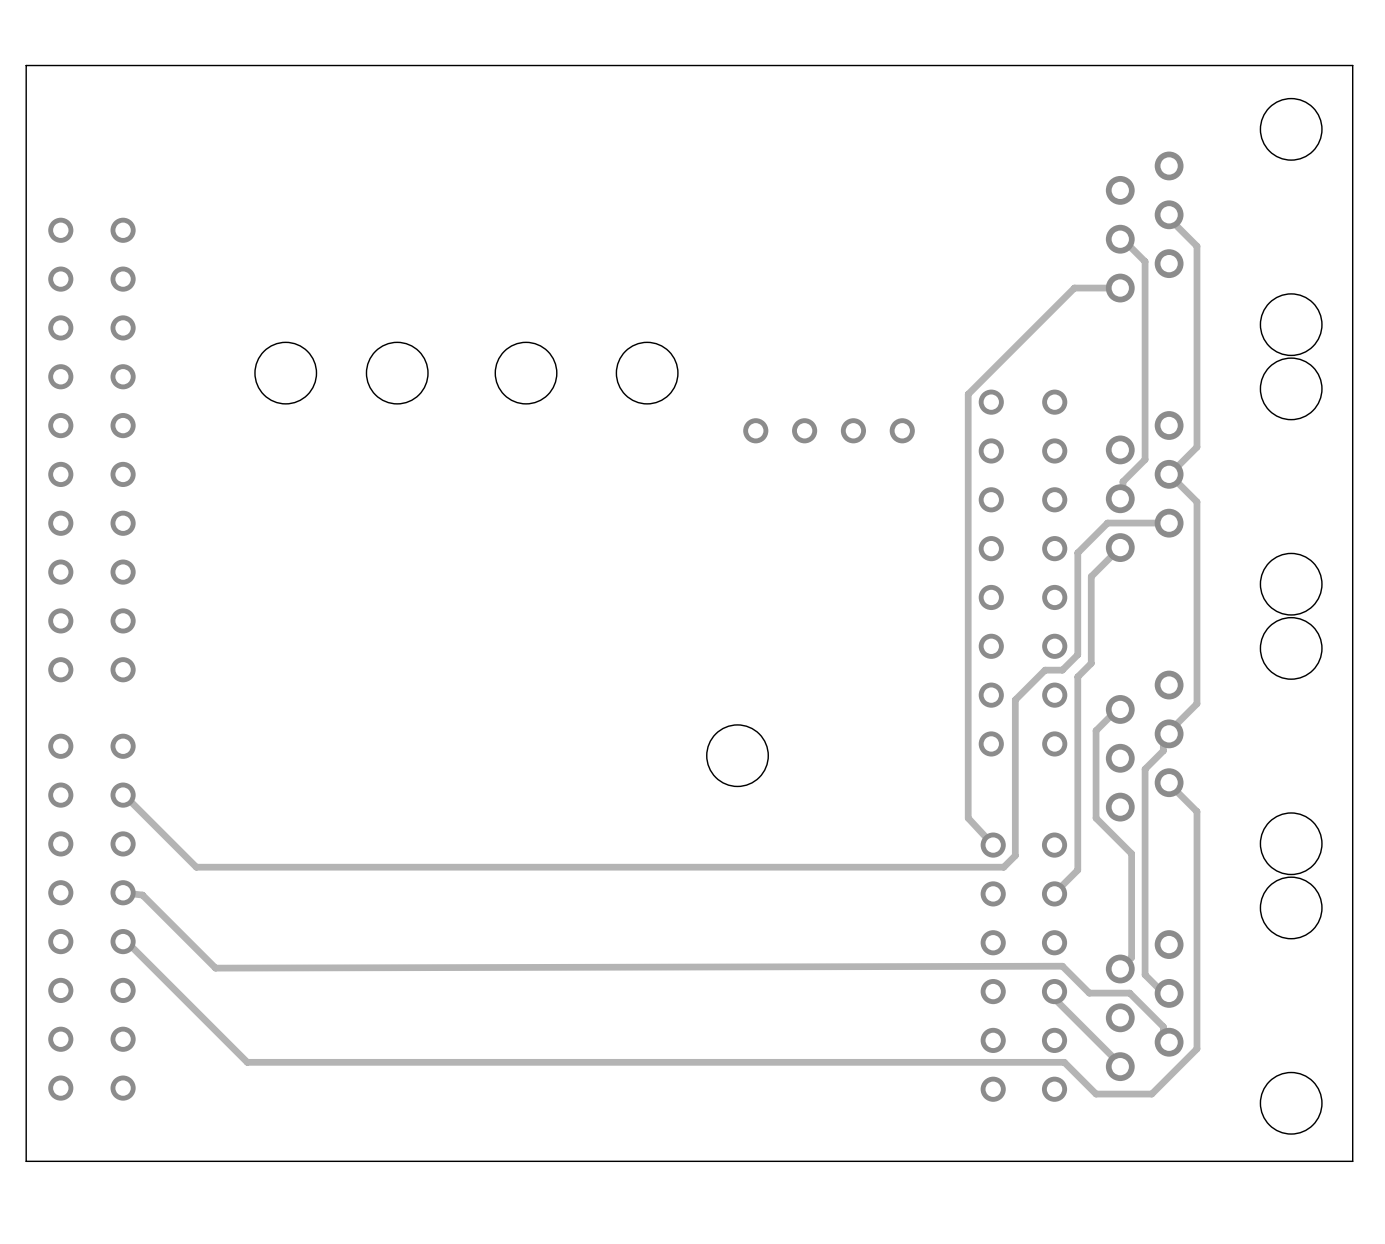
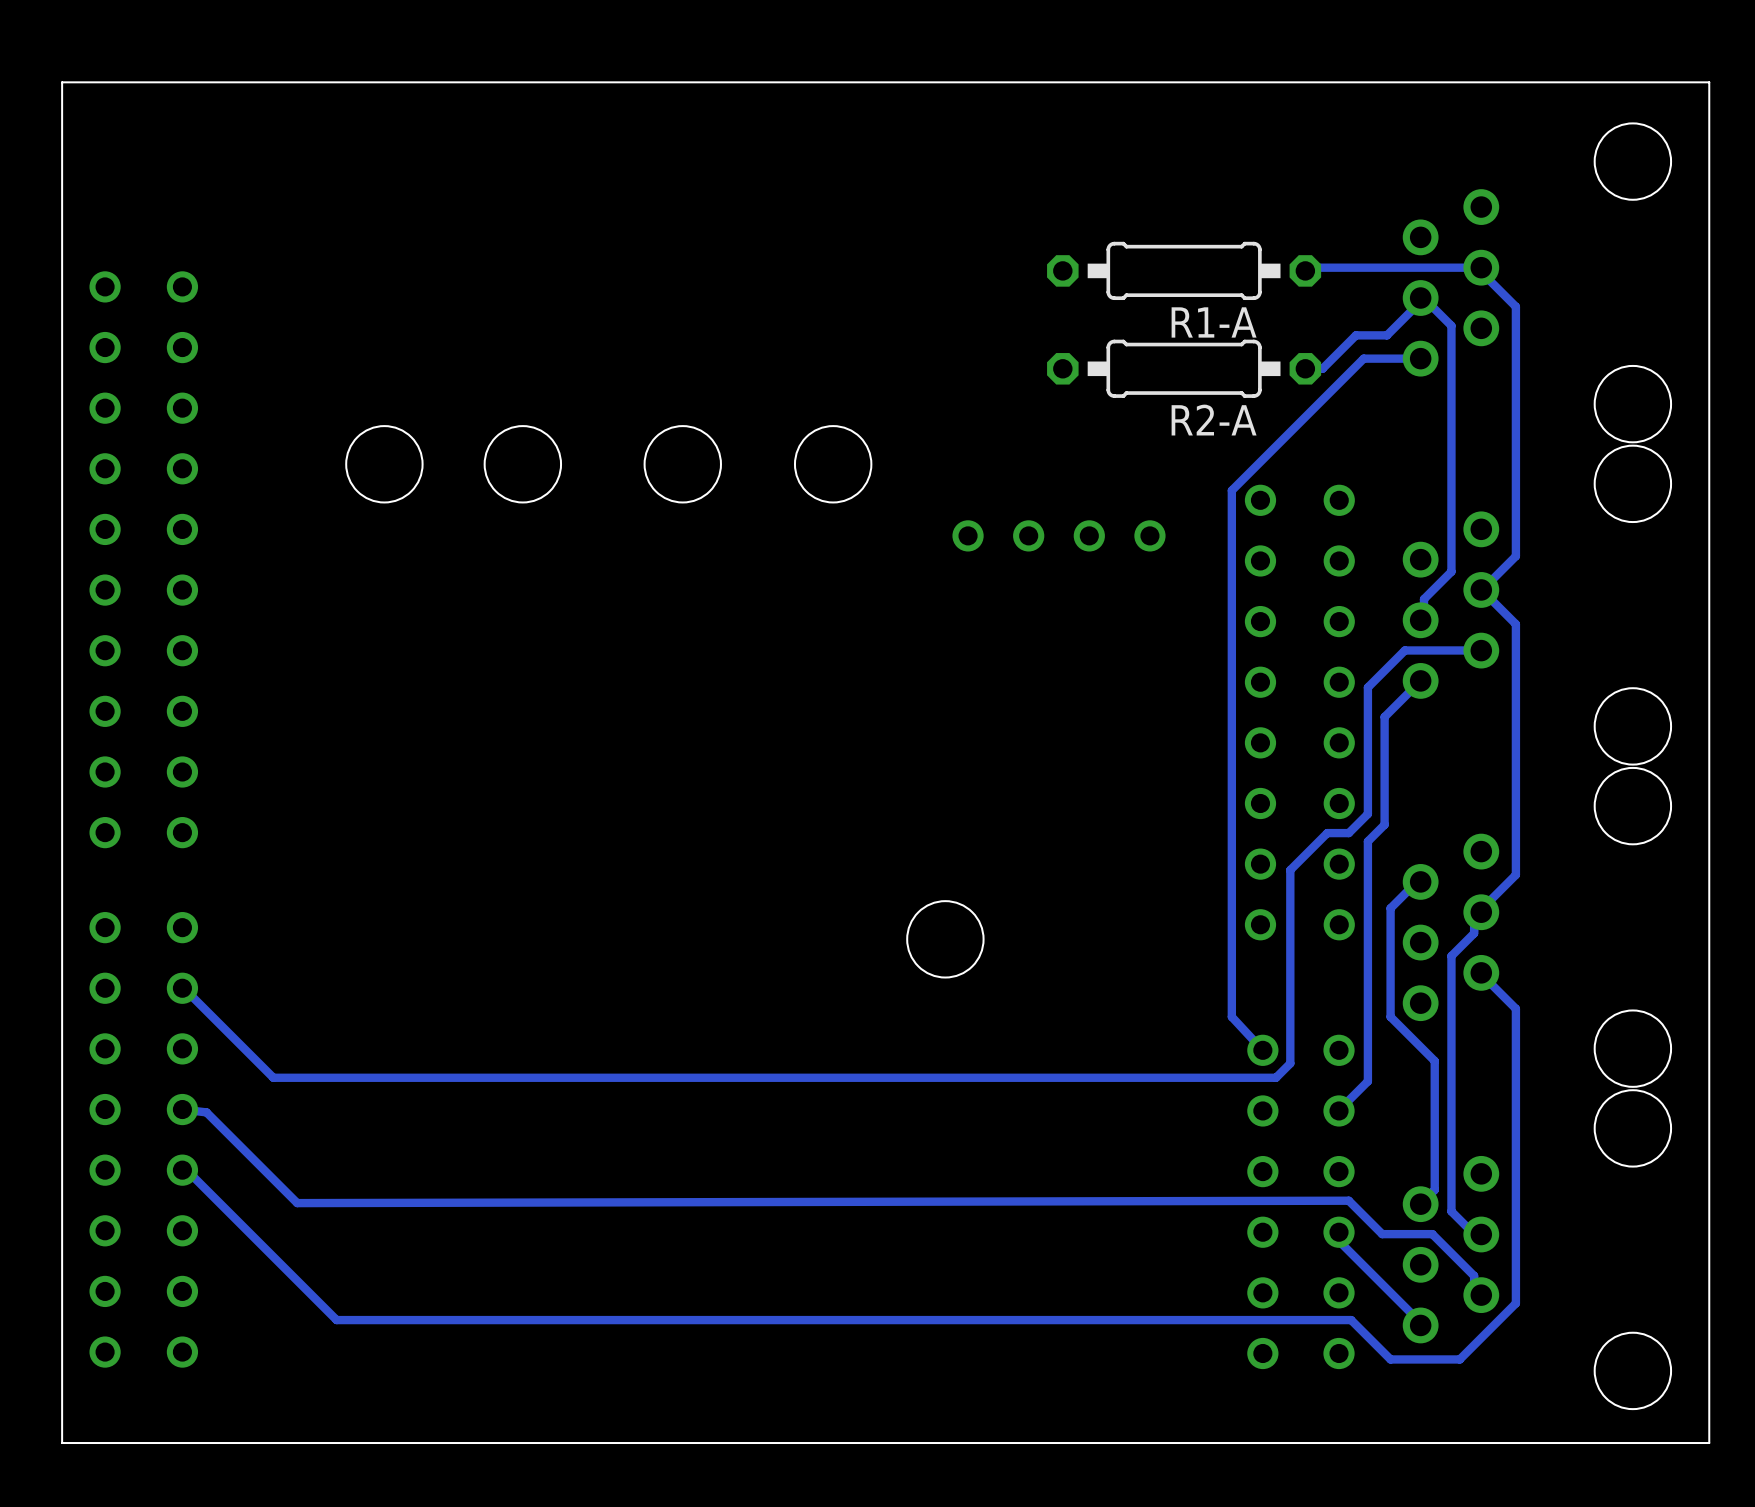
track: none -> (1481, 267) (1310, 267) (1305, 270)
R1-A: none -> (1184, 270)
track: none -> (1420, 298) (1419, 303) (1387, 335) (1355, 335) (1322, 368) (1305, 368)
R2-A: none -> (1184, 368)

